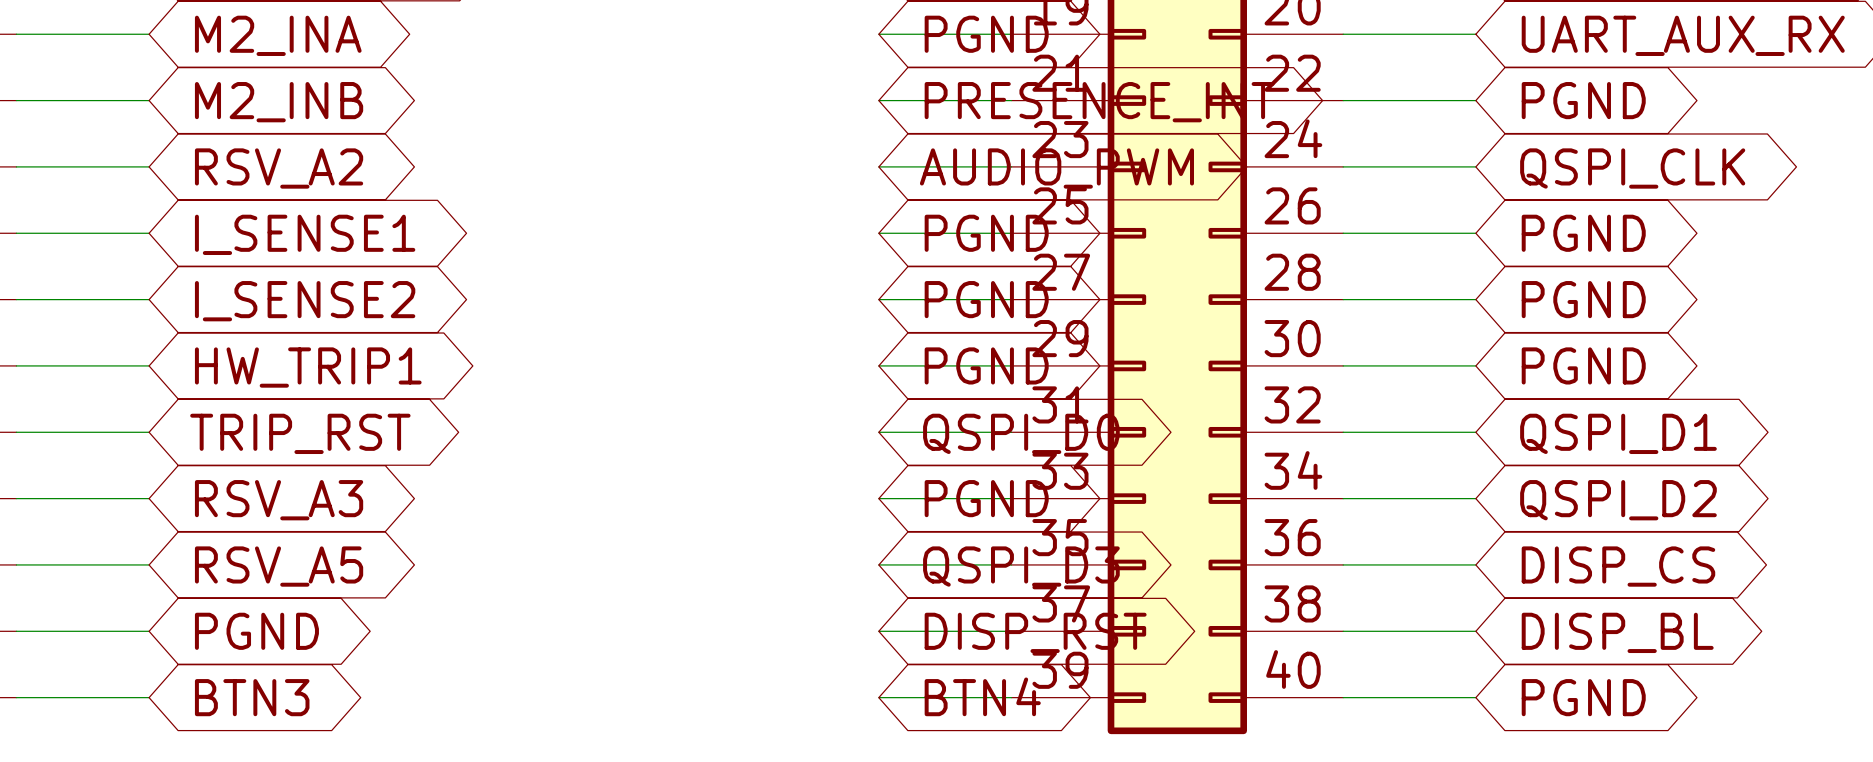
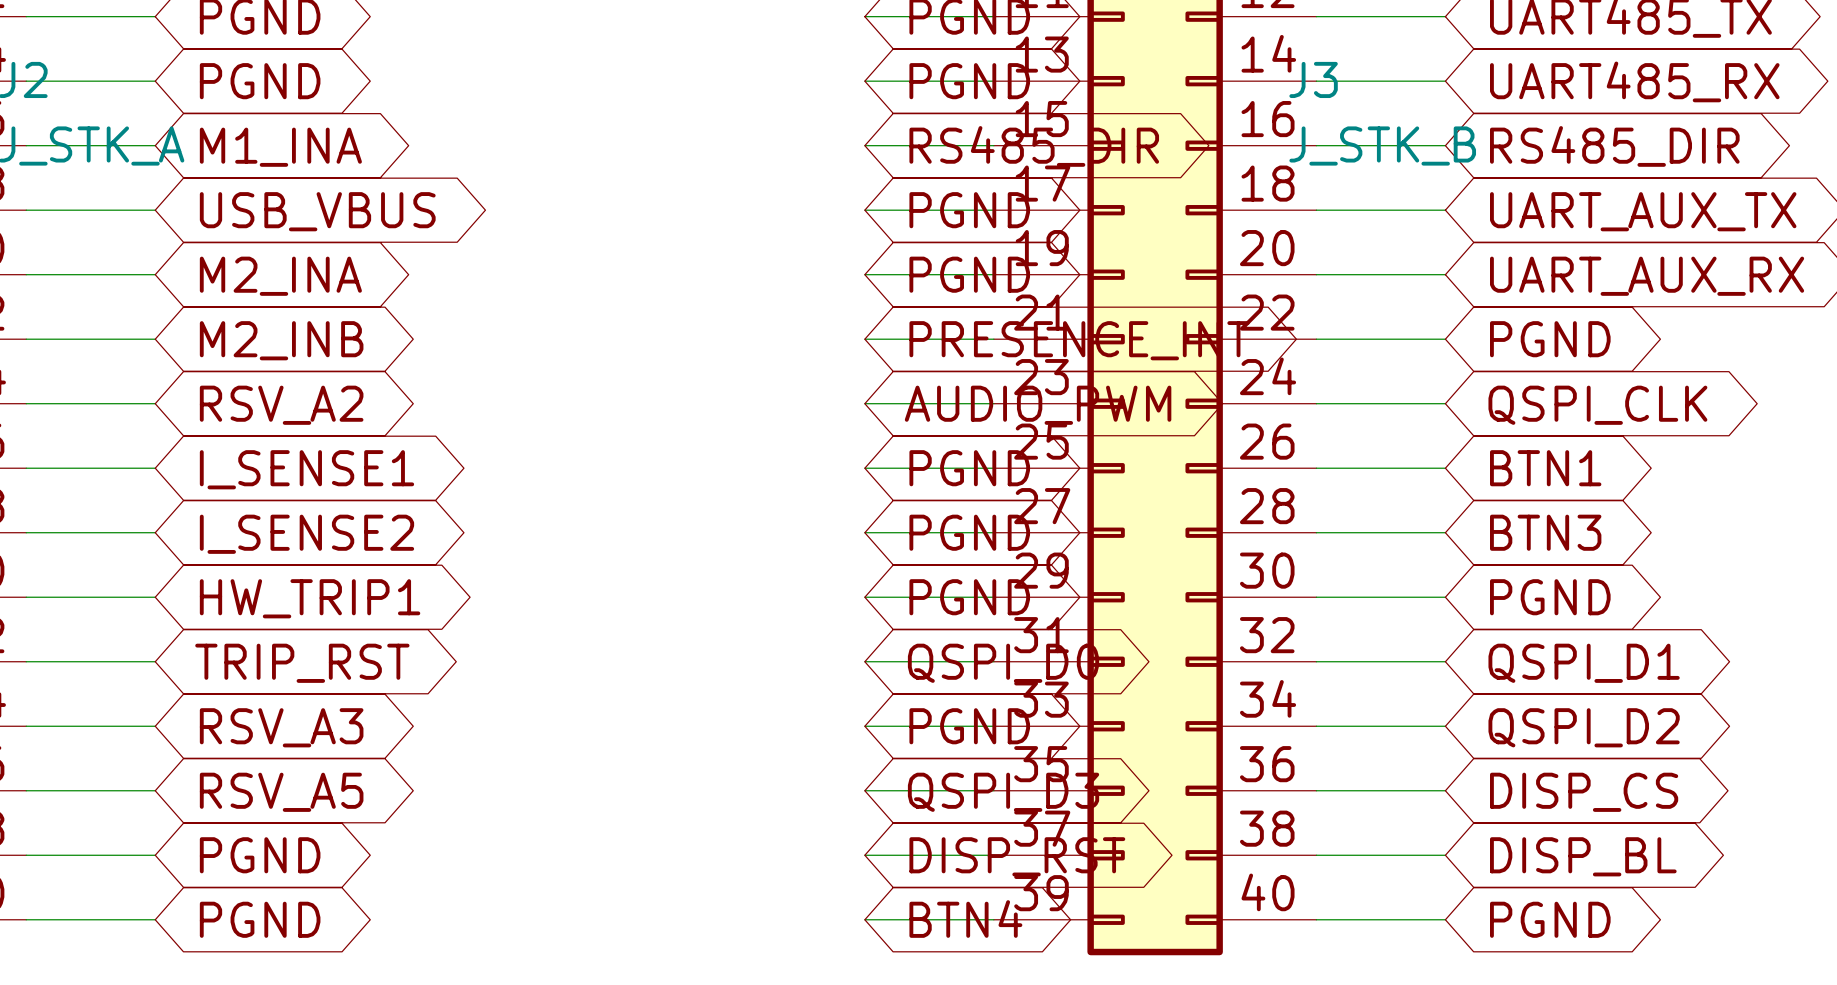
global label: PGND (1583, 233) -> BTN1 (1545, 468)
global label: PGND (1583, 299) -> BTN3 (1545, 532)
global label: BTN3 (252, 697) -> PGND (260, 919)

